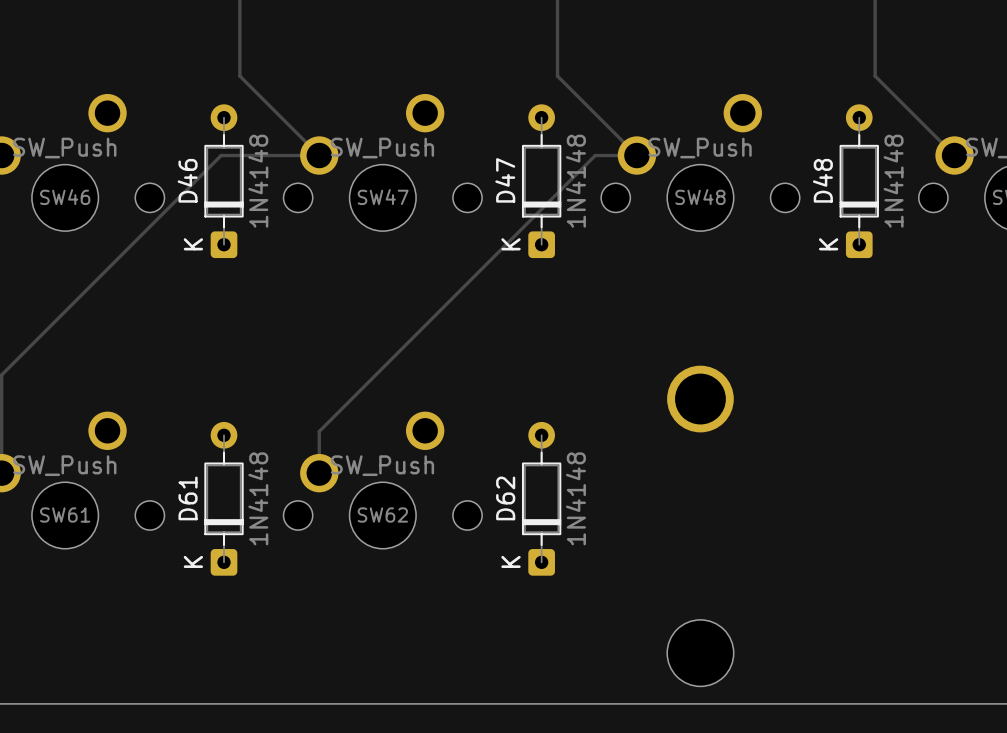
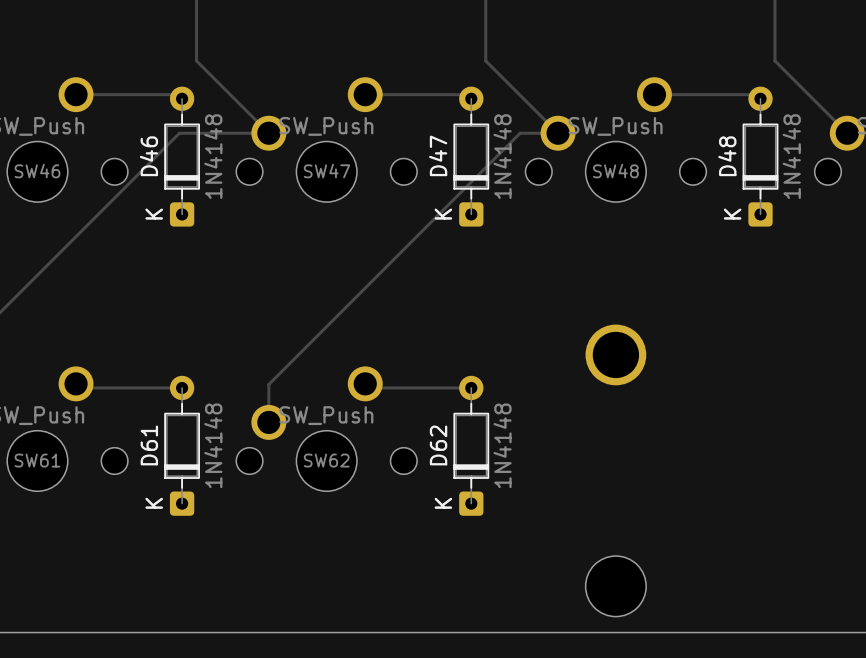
track: none -> (76, 94) (177, 94) (182, 98)
track: none -> (365, 94) (467, 94) (471, 98)
track: none -> (654, 94) (756, 94) (760, 98)
track: none -> (76, 383) (80, 387) (182, 387)
track: none -> (365, 383) (369, 387) (471, 387)

